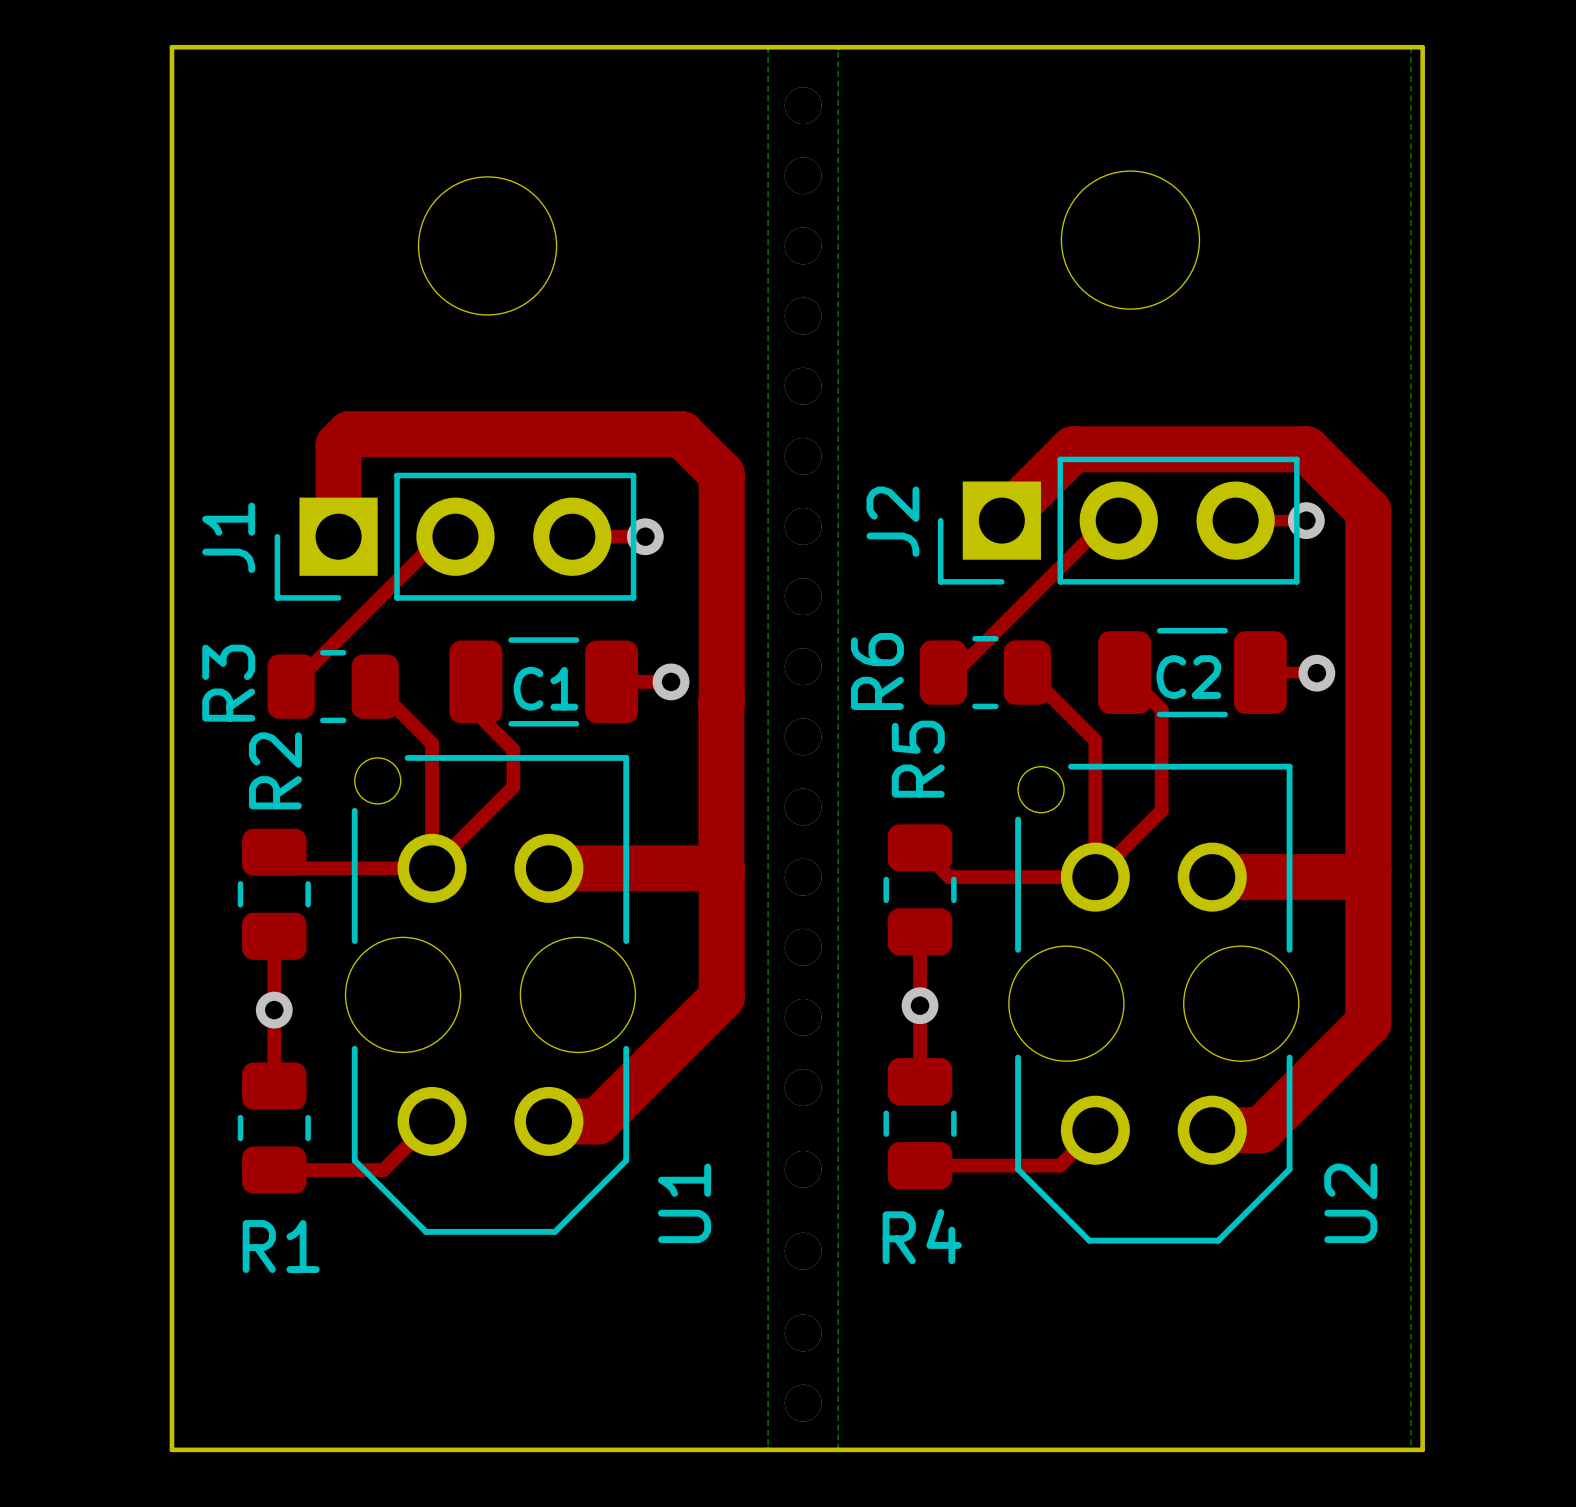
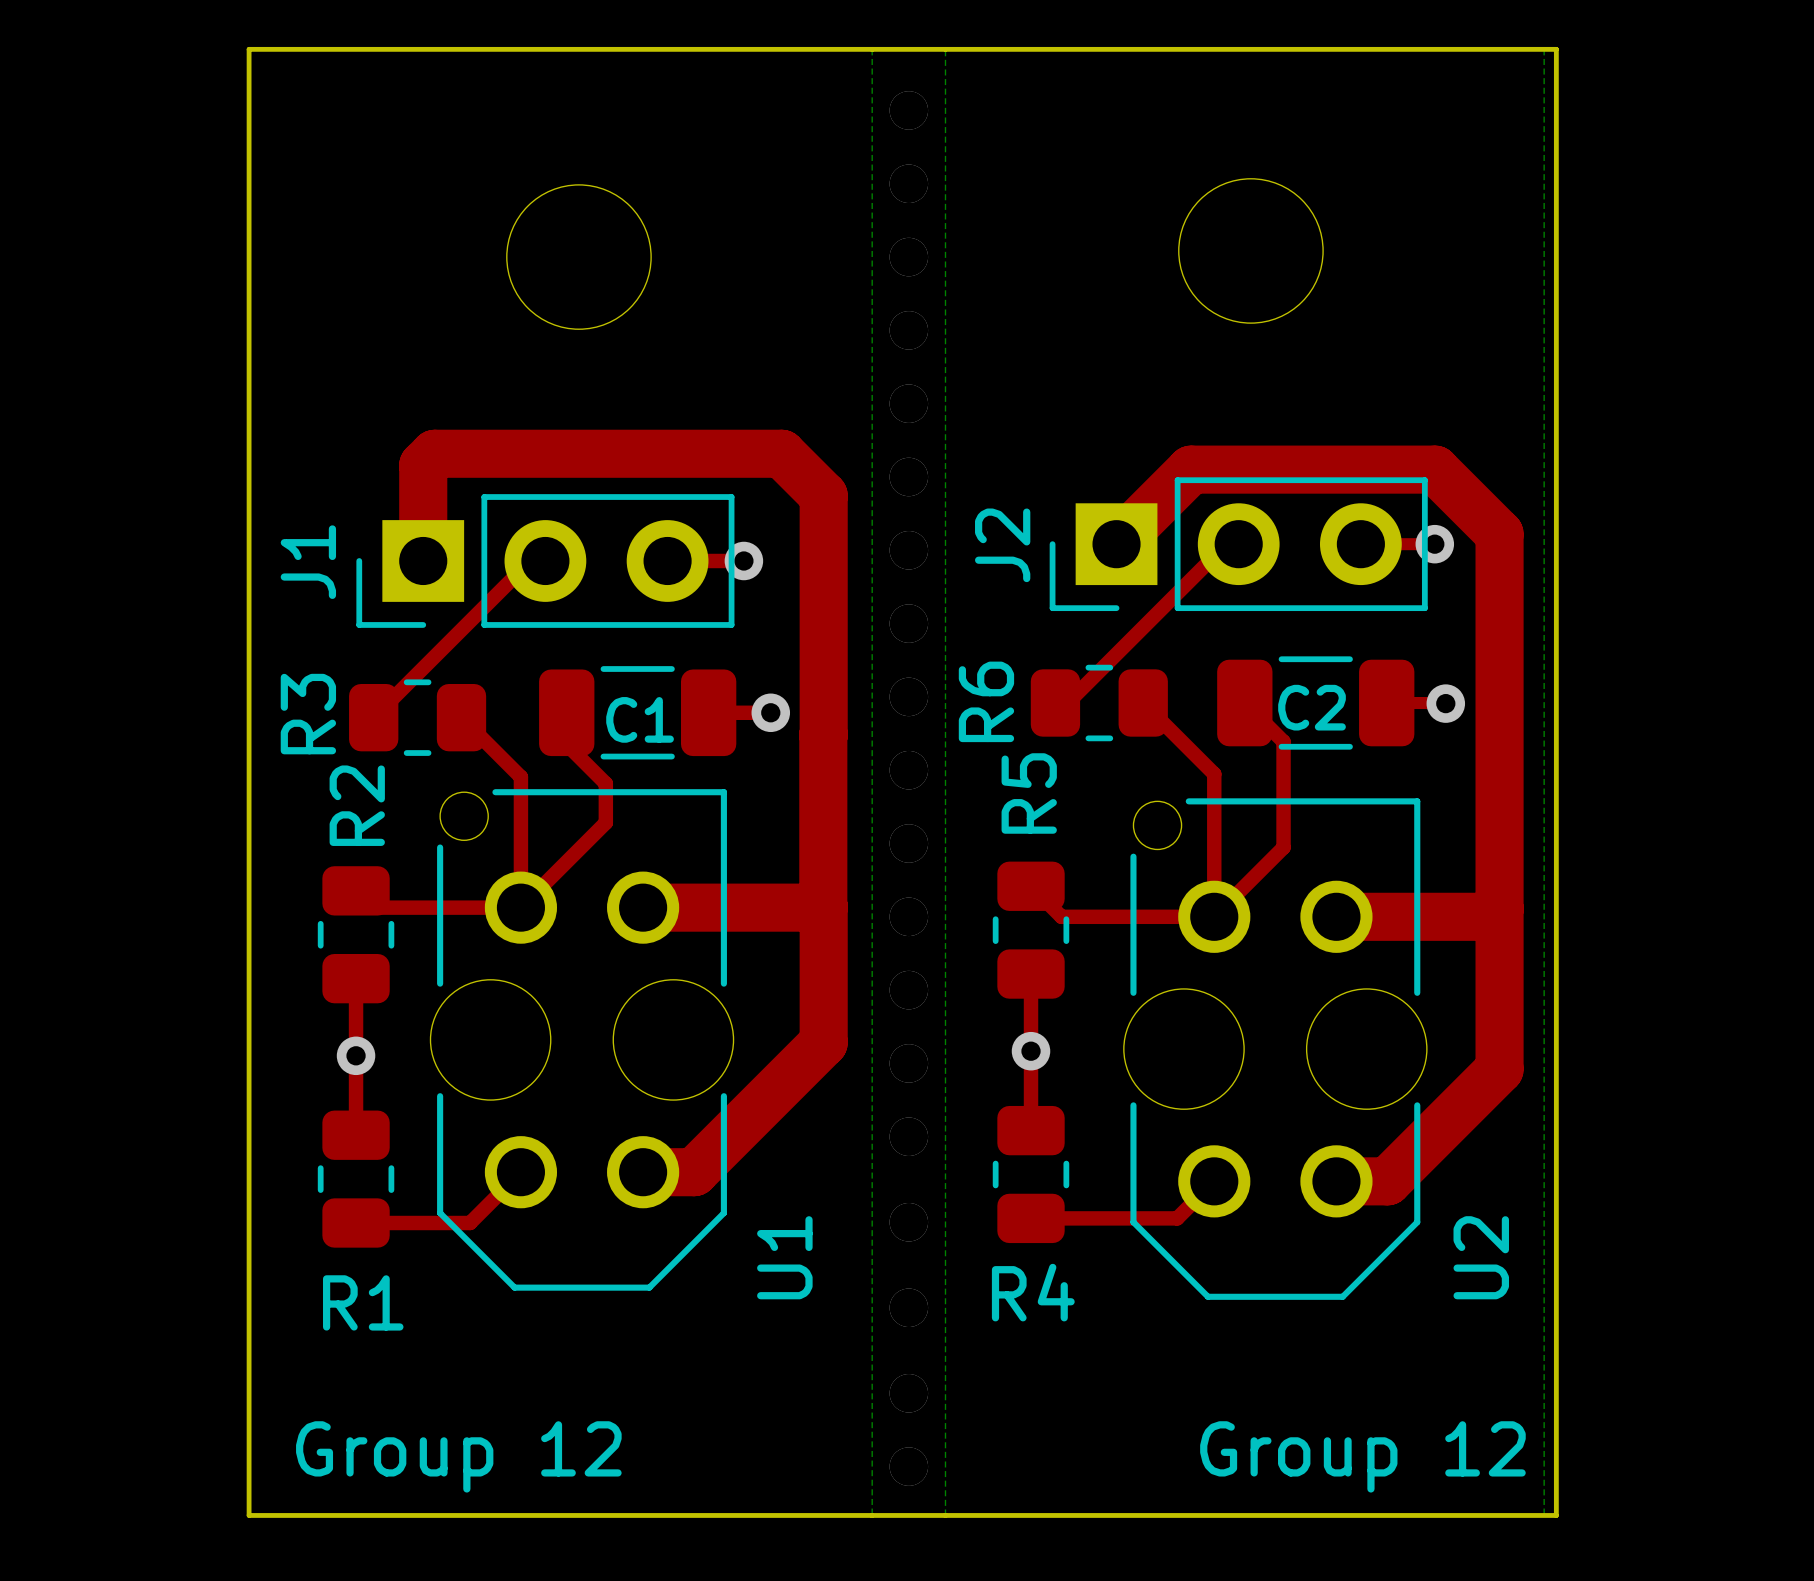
text: none -> Group 12 (458, 1456)
text: none -> Group 12 (1362, 1456)

